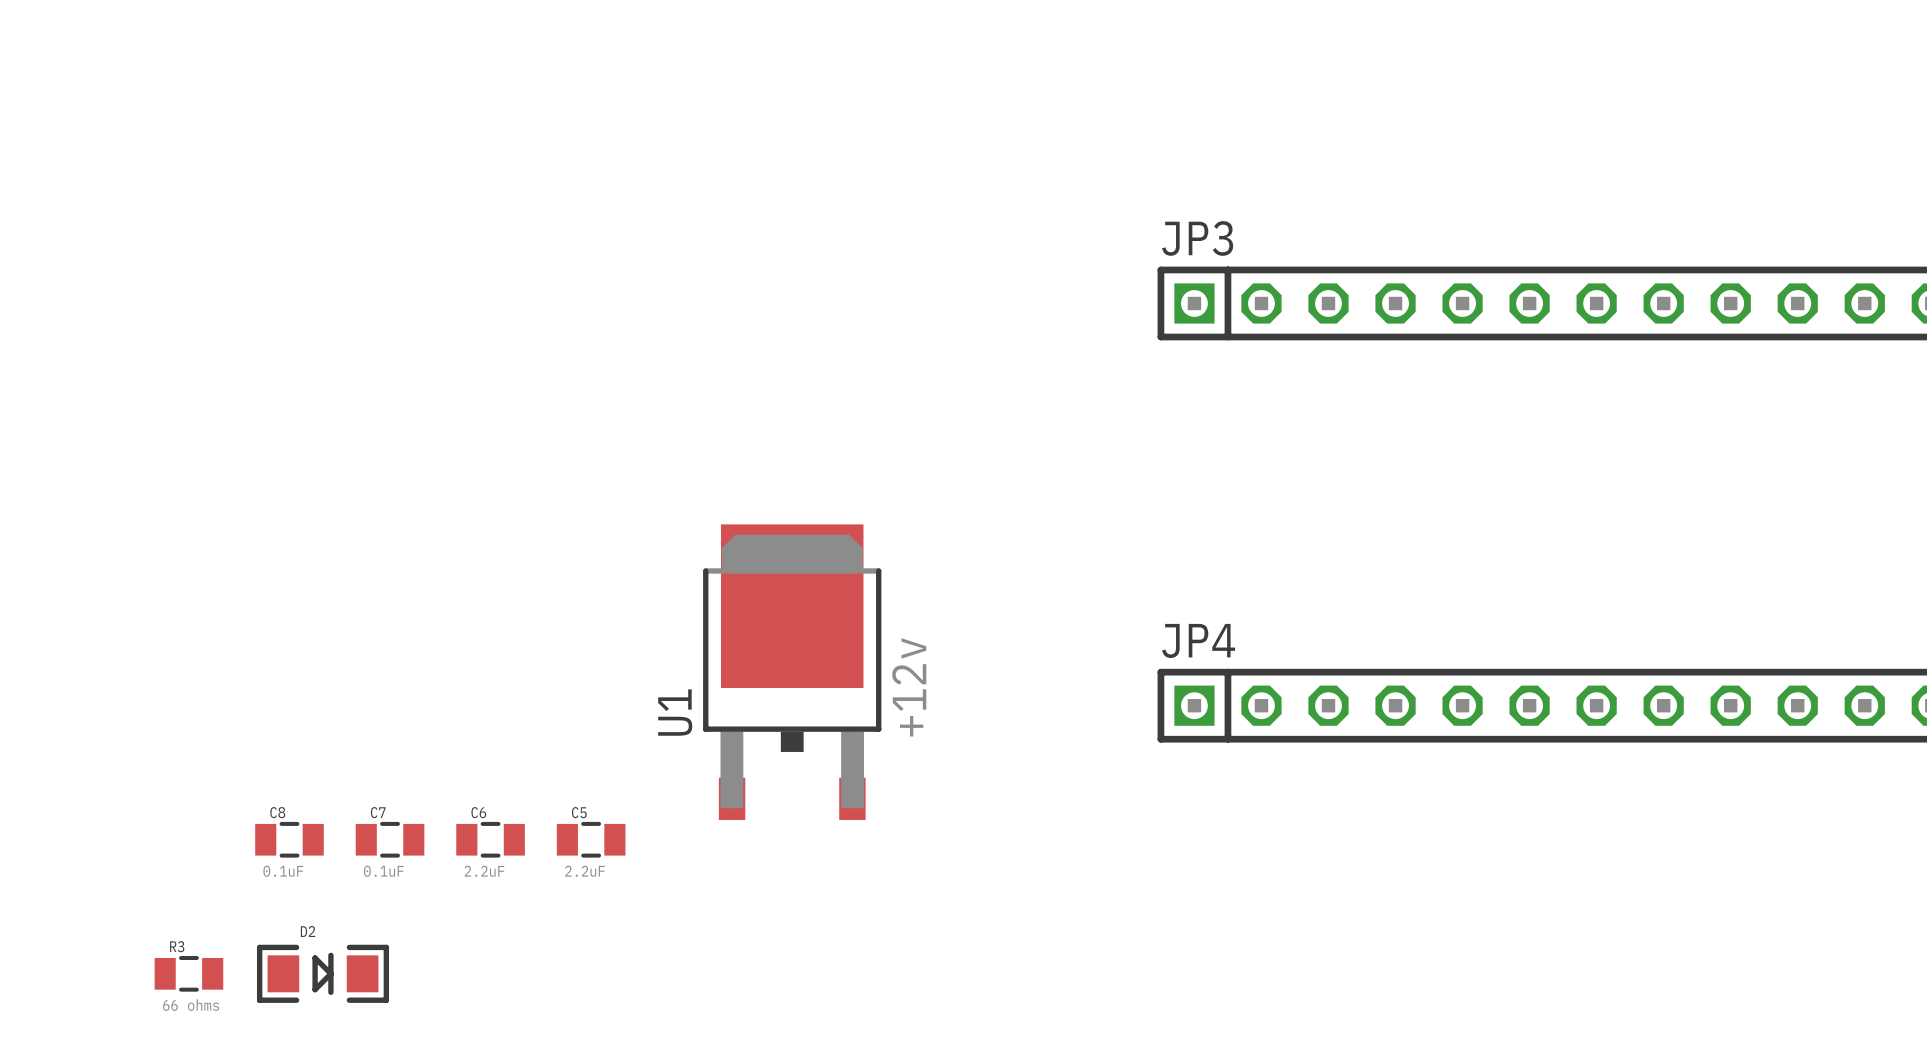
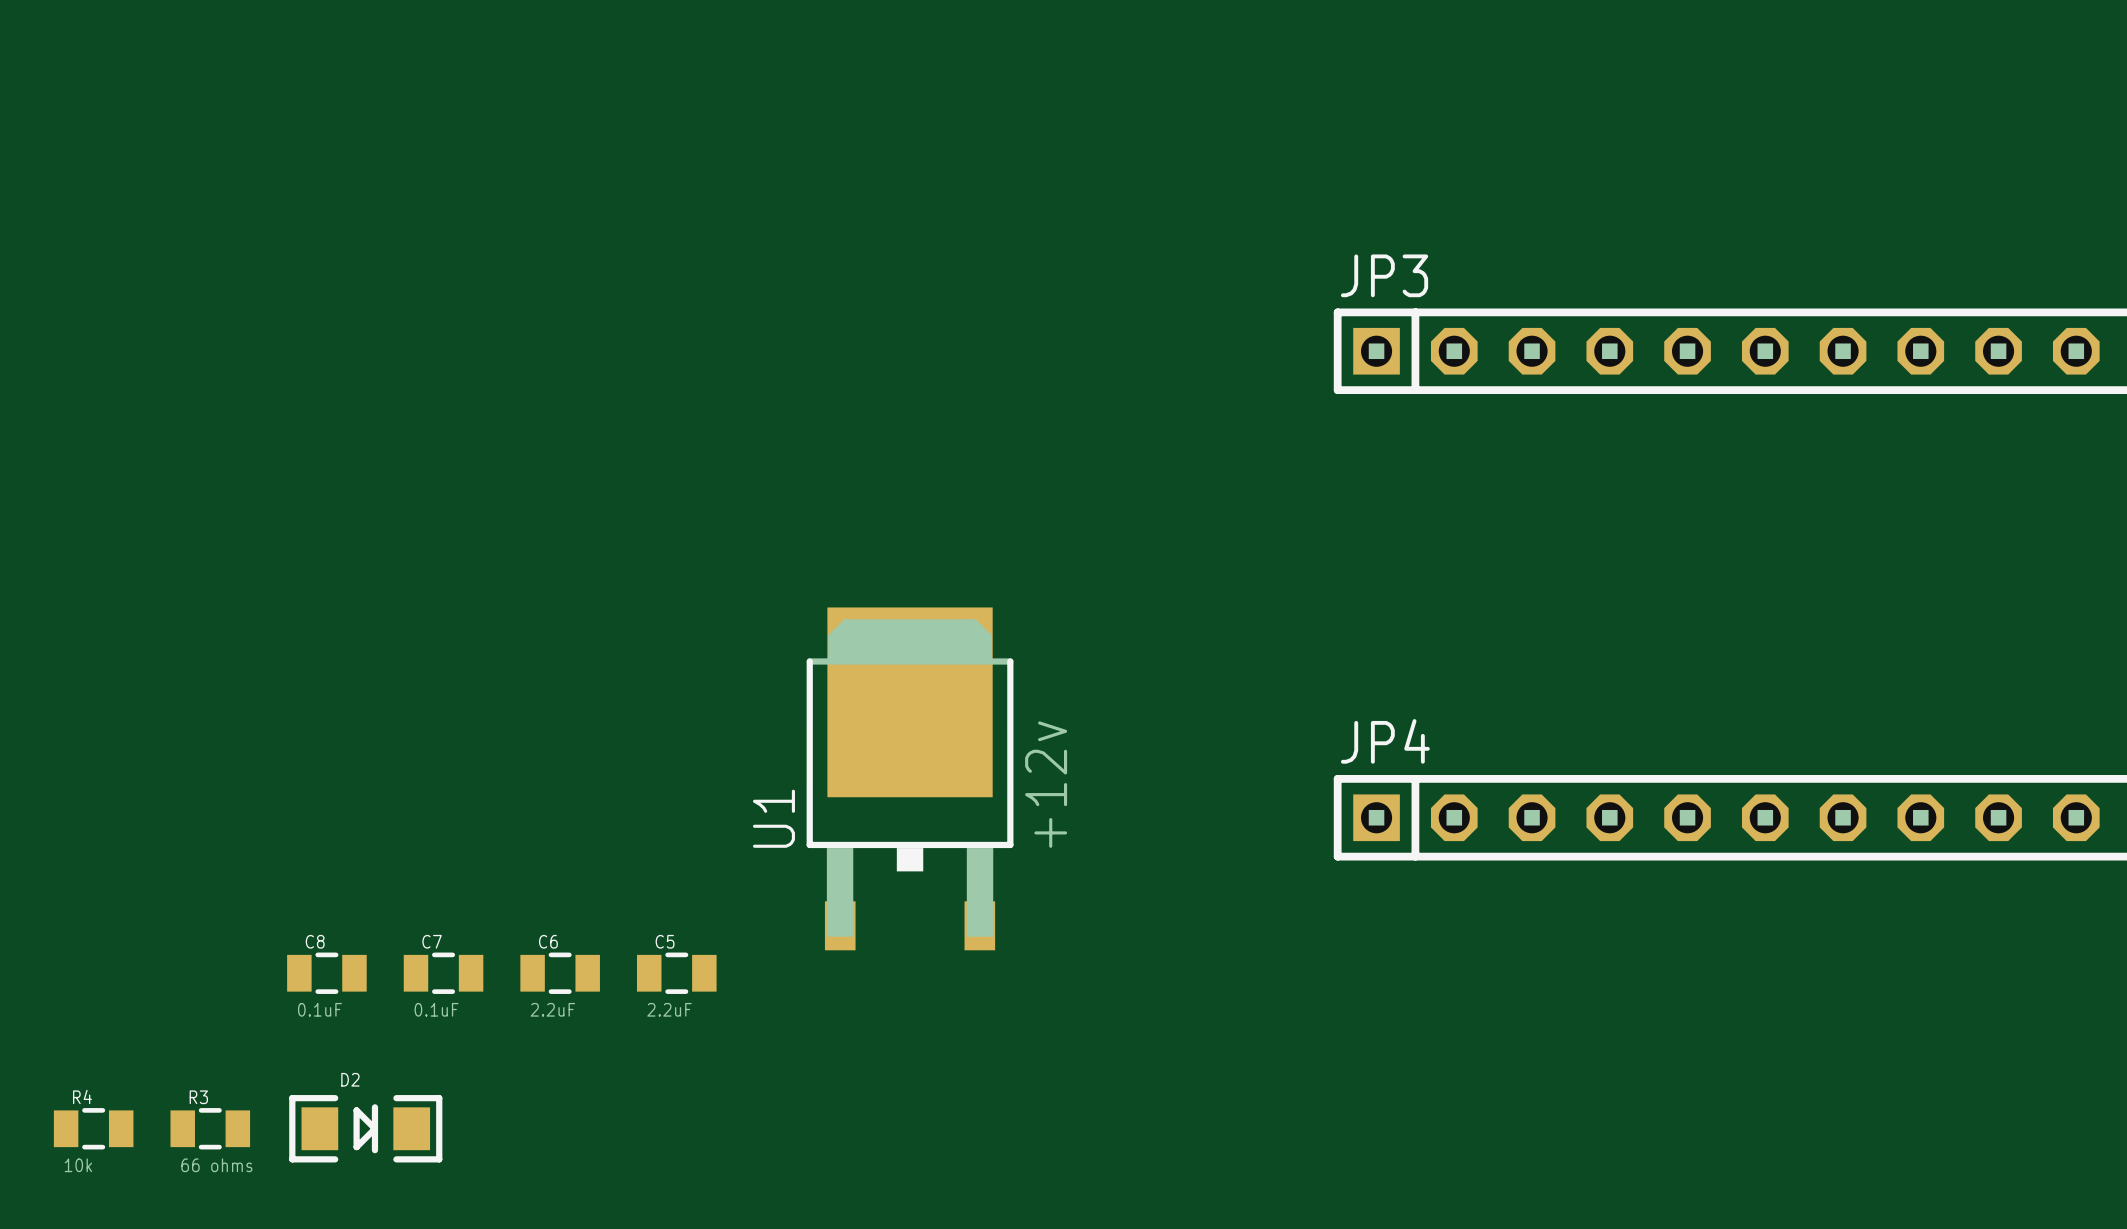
R4: none -> 10k (93, 1128)

